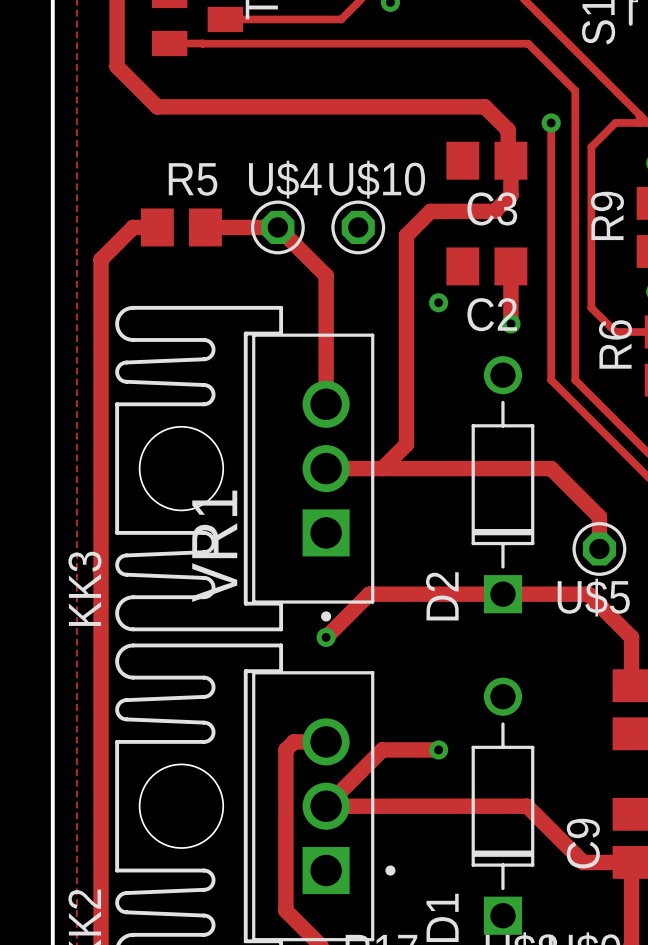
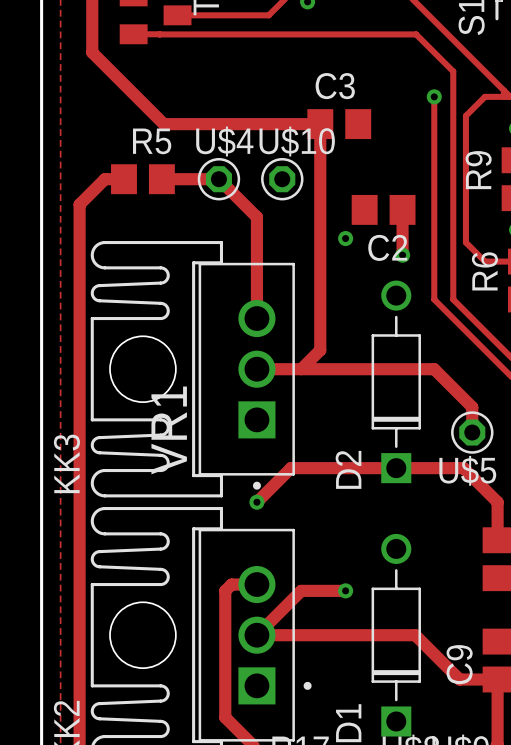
track: (157, 106) (484, 106) (508, 130) (510, 195) -> (123, 84) (163, 124) (320, 124) (320, 185)
C3 position: (486, 160) -> (339, 124)
track: (511, 195) (494, 211) (430, 211) (406, 235) -> none
C3 name position: C3 (492, 208) -> C3 (335, 86)

